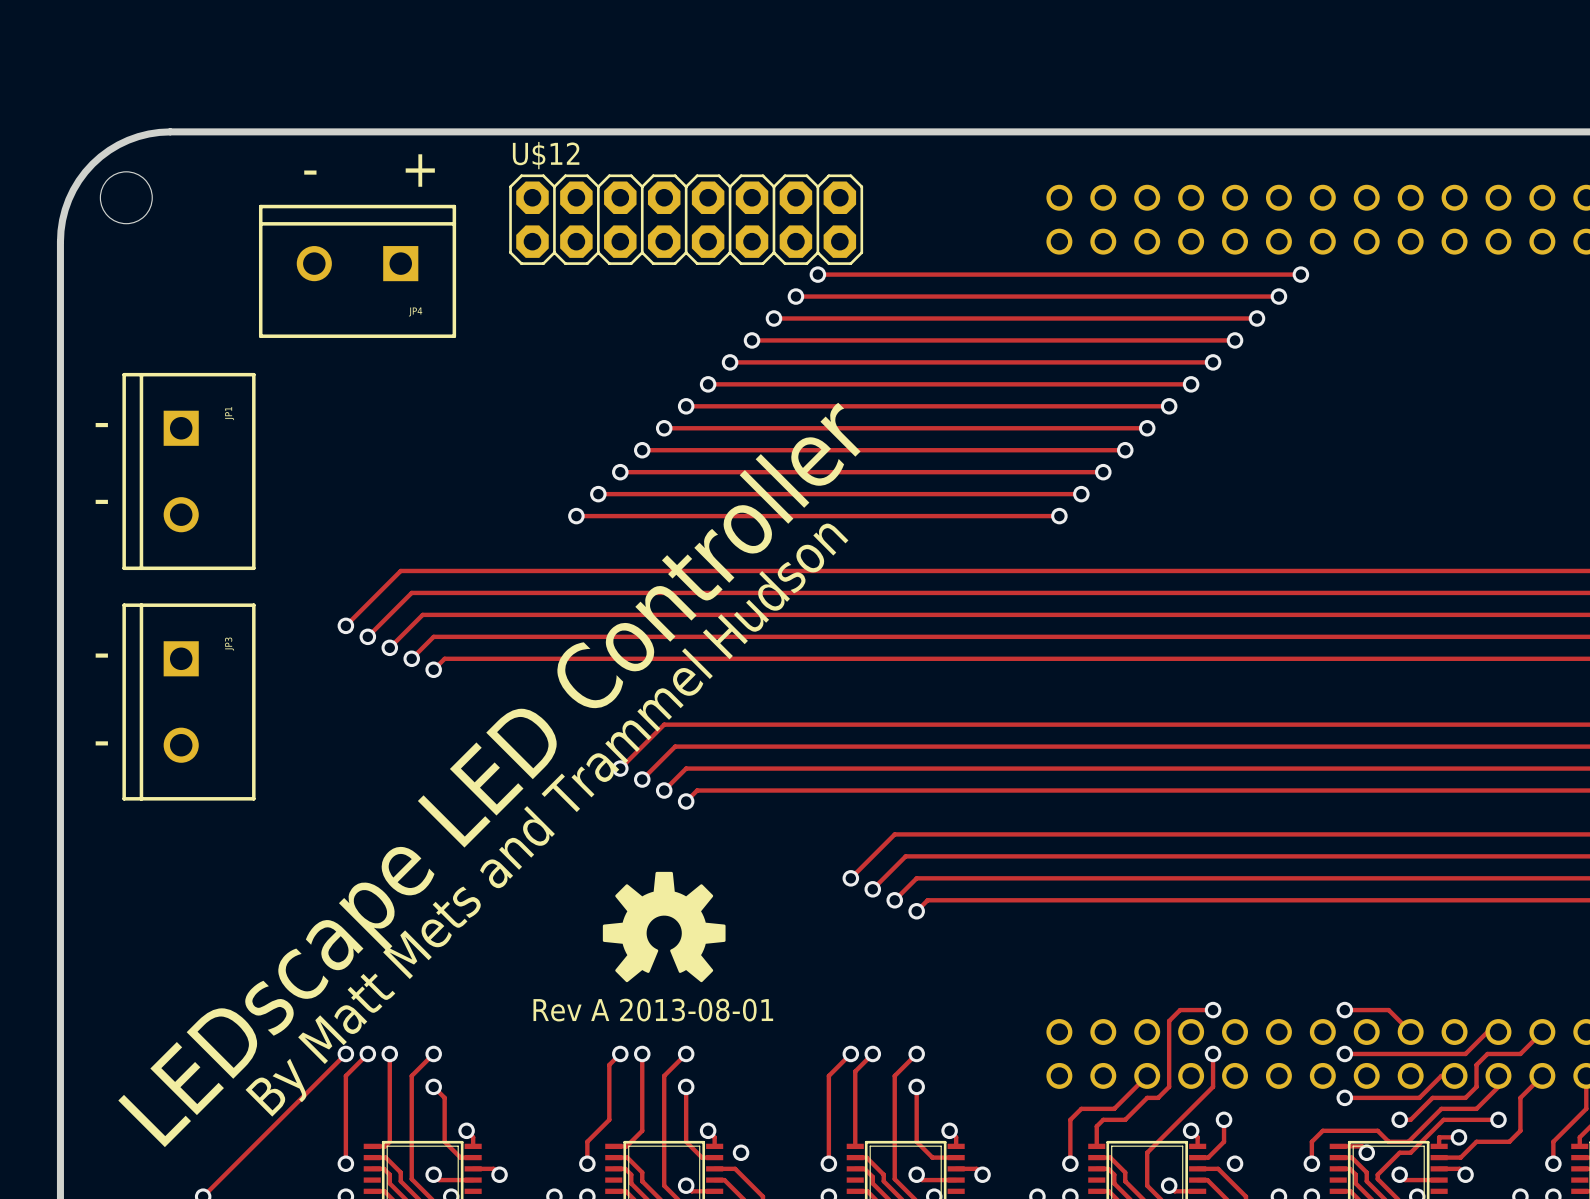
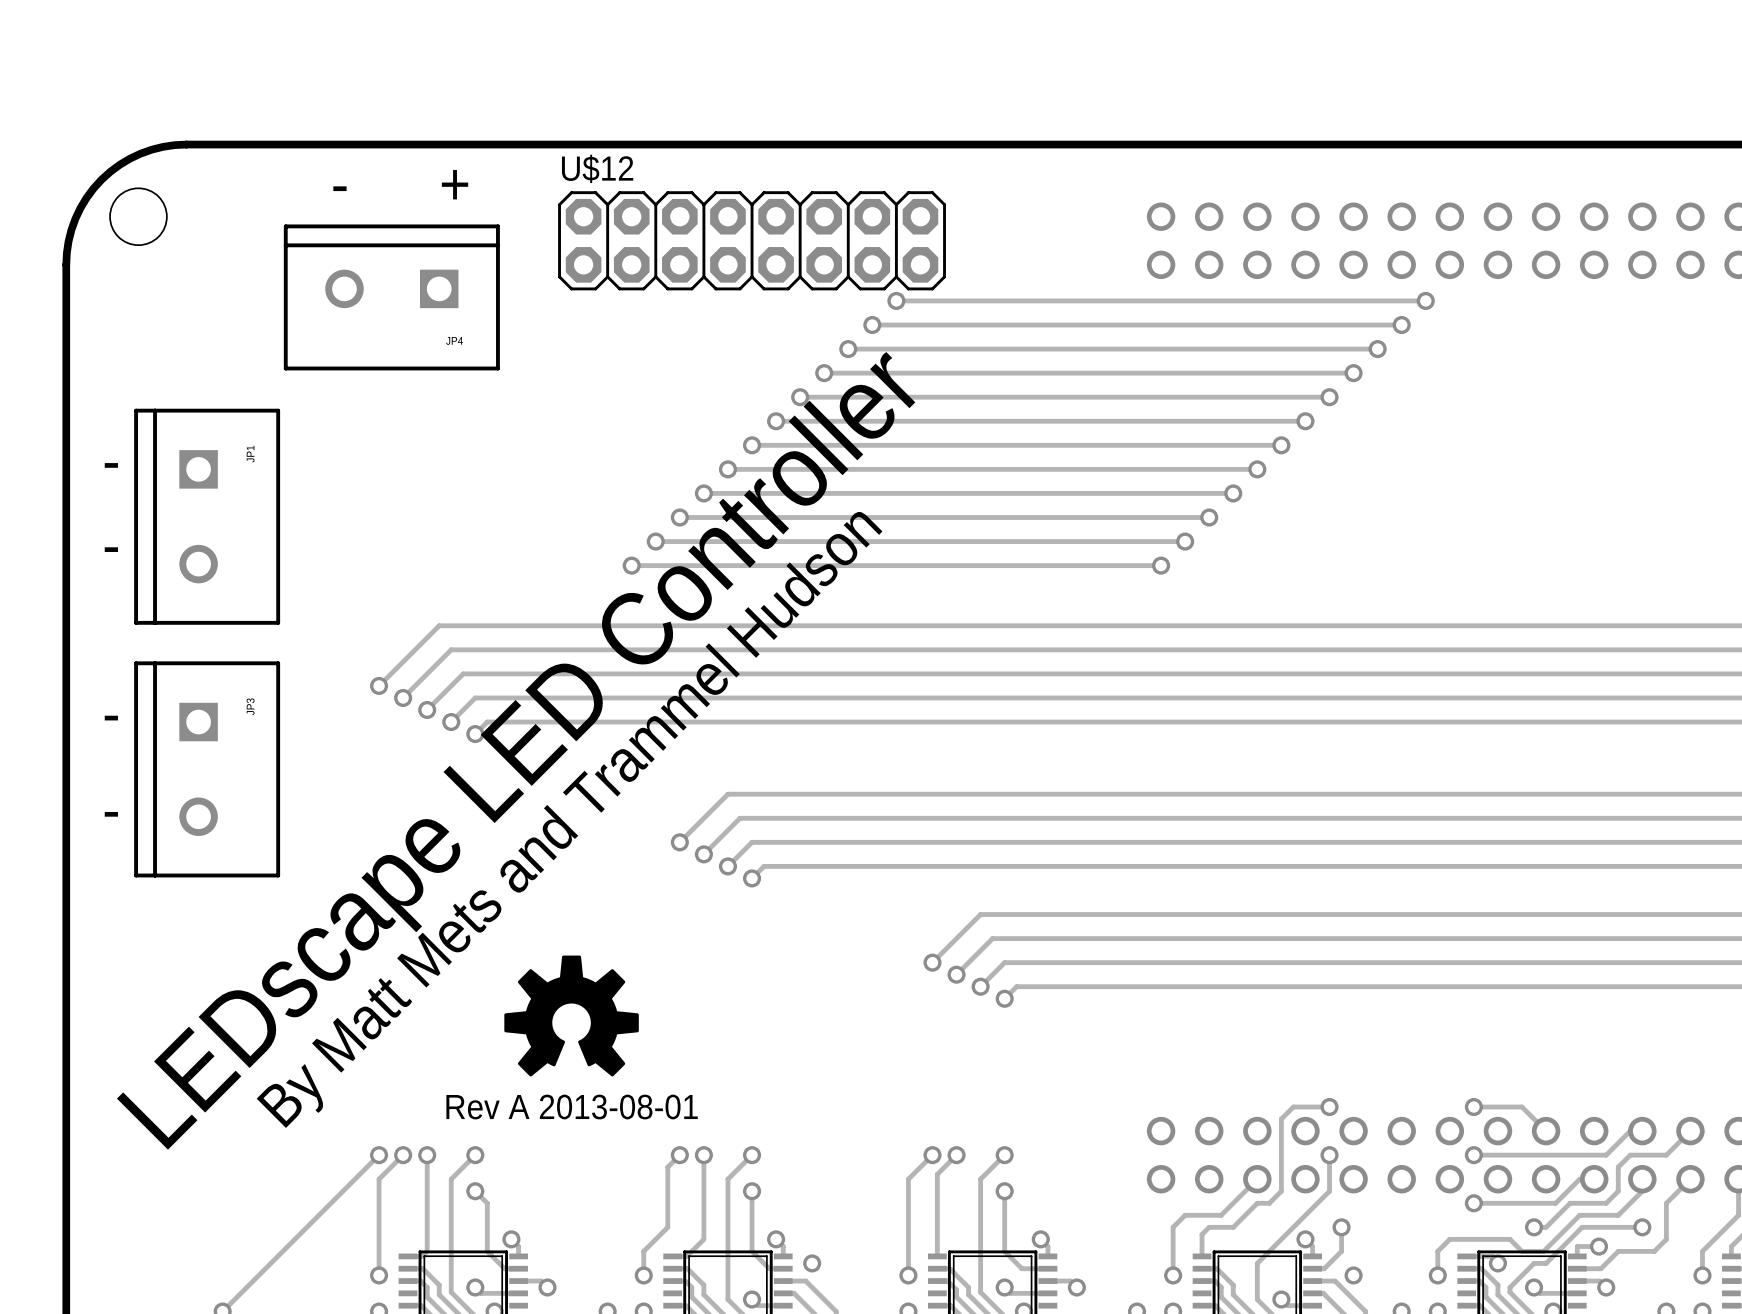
text position: LEDscape LED Controller (489, 774) -> LEDscape LED Controller (516, 750)
text position: By Matt Mets and Trammel Hudson (546, 819) -> By Matt Mets and Trammel Hudson (569, 819)
drawing position: (664, 927) -> (571, 1016)
text position: Rev A 2013-08-01 (653, 1010) -> Rev A 2013-08-01 (572, 1107)

